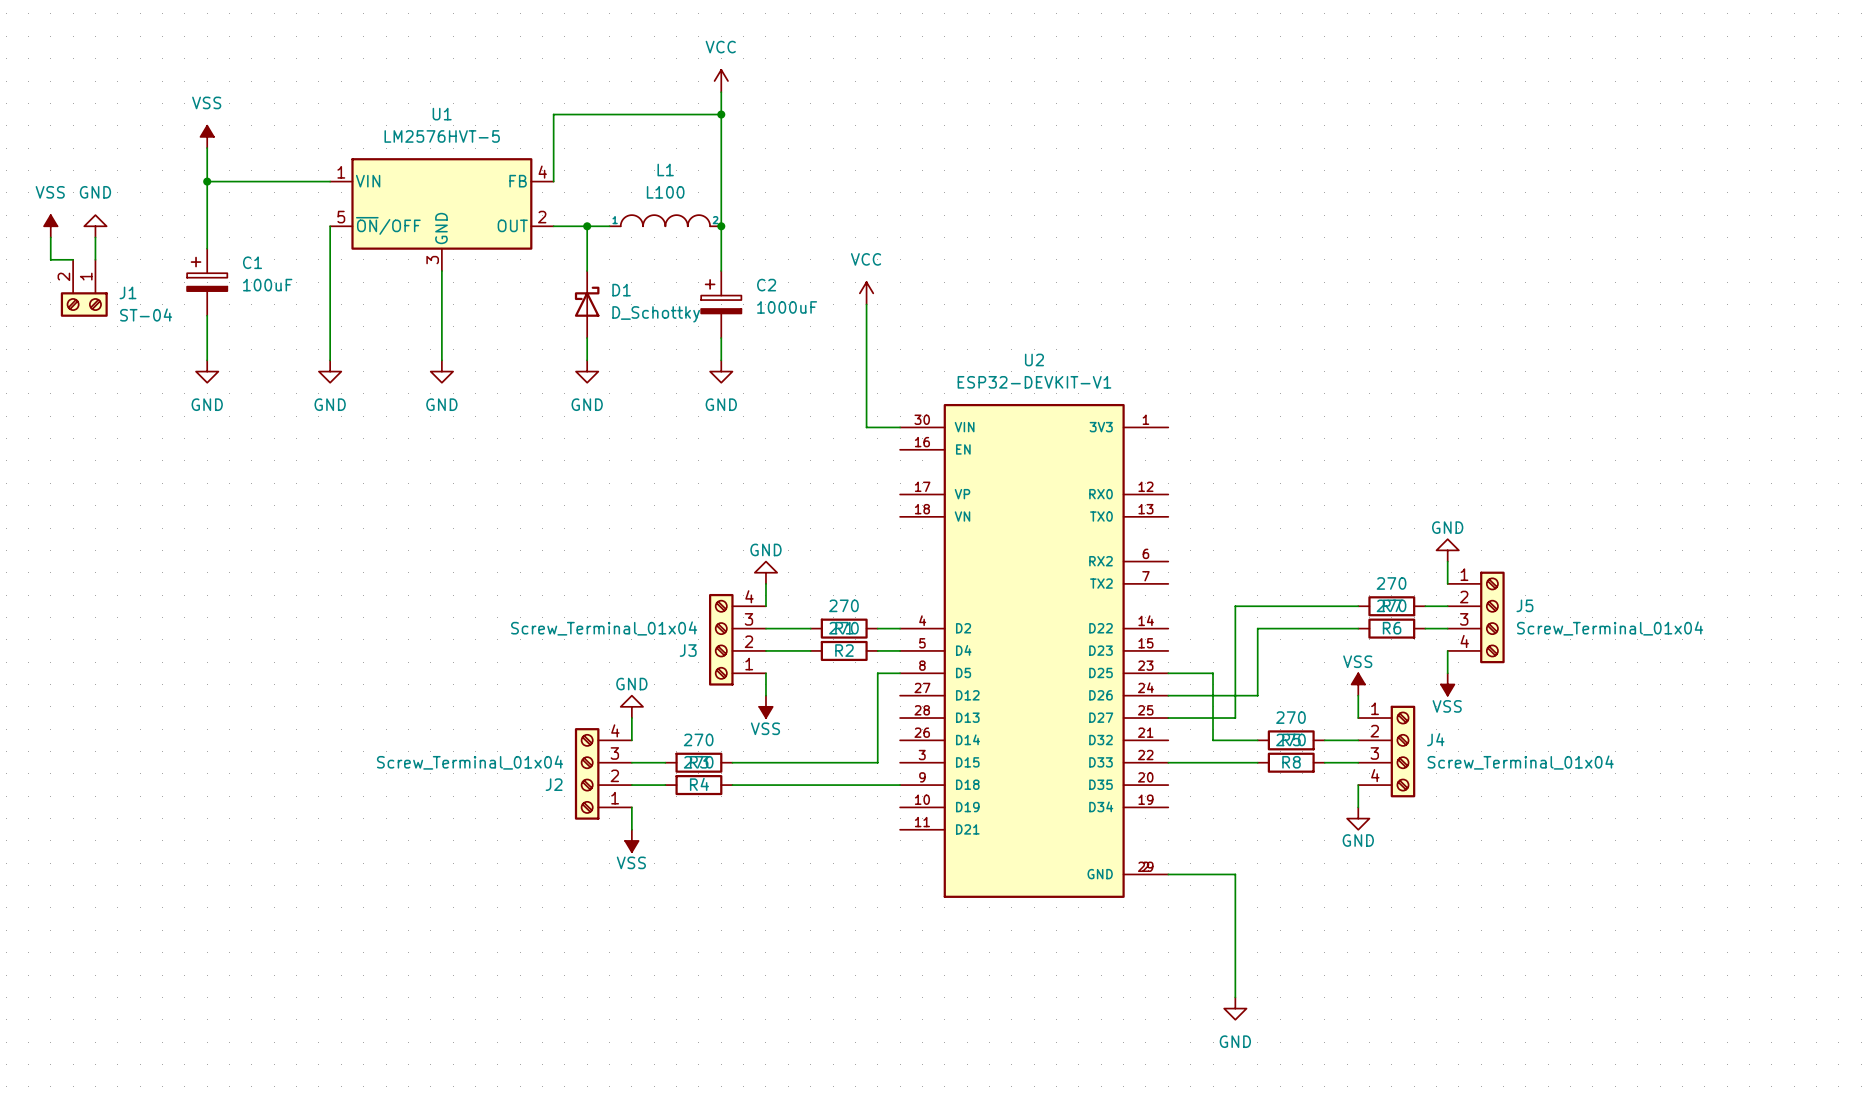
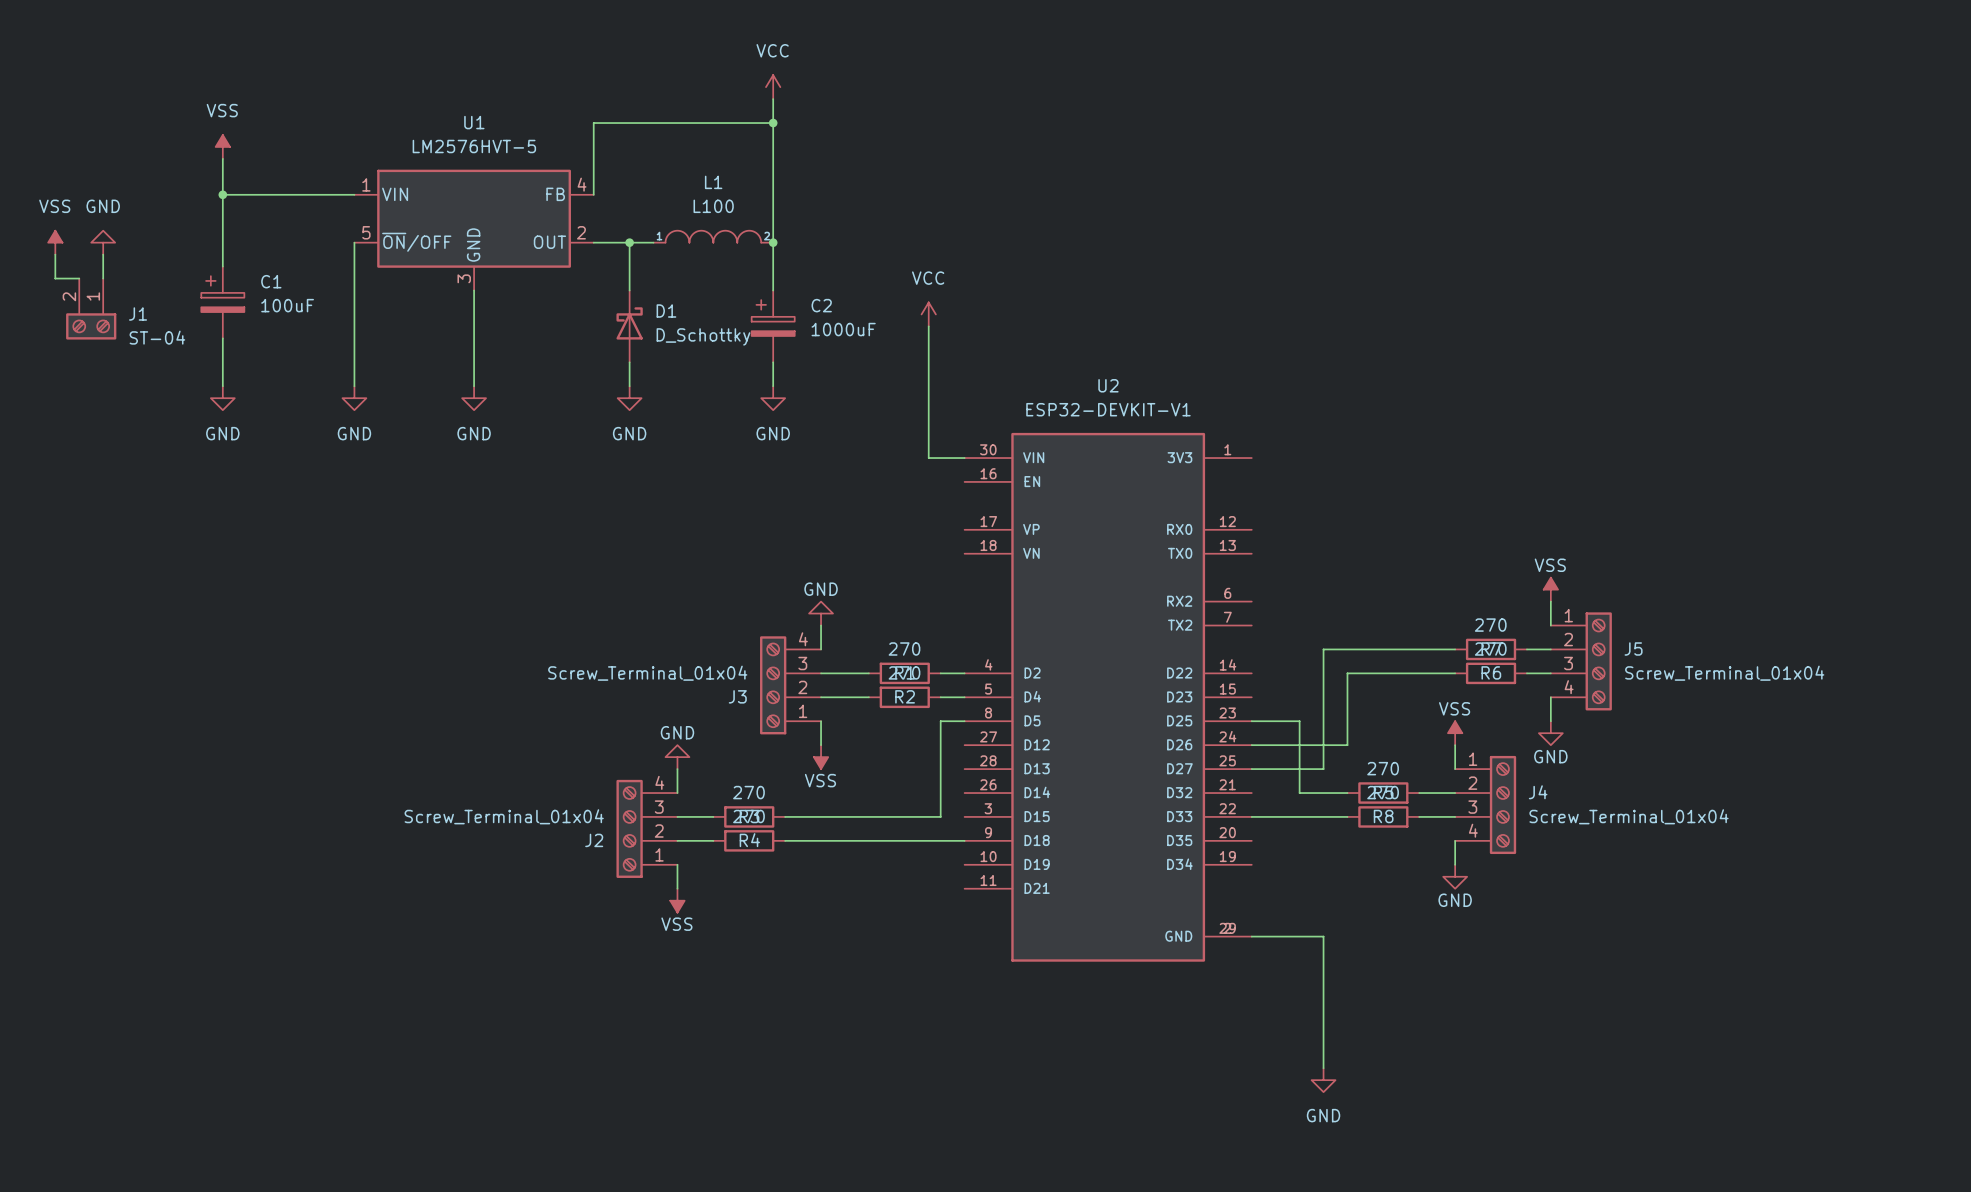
power symbol: GND (1447, 550) -> VSS (1550, 589)
power symbol: VSS (1447, 684) -> GND (1550, 733)

